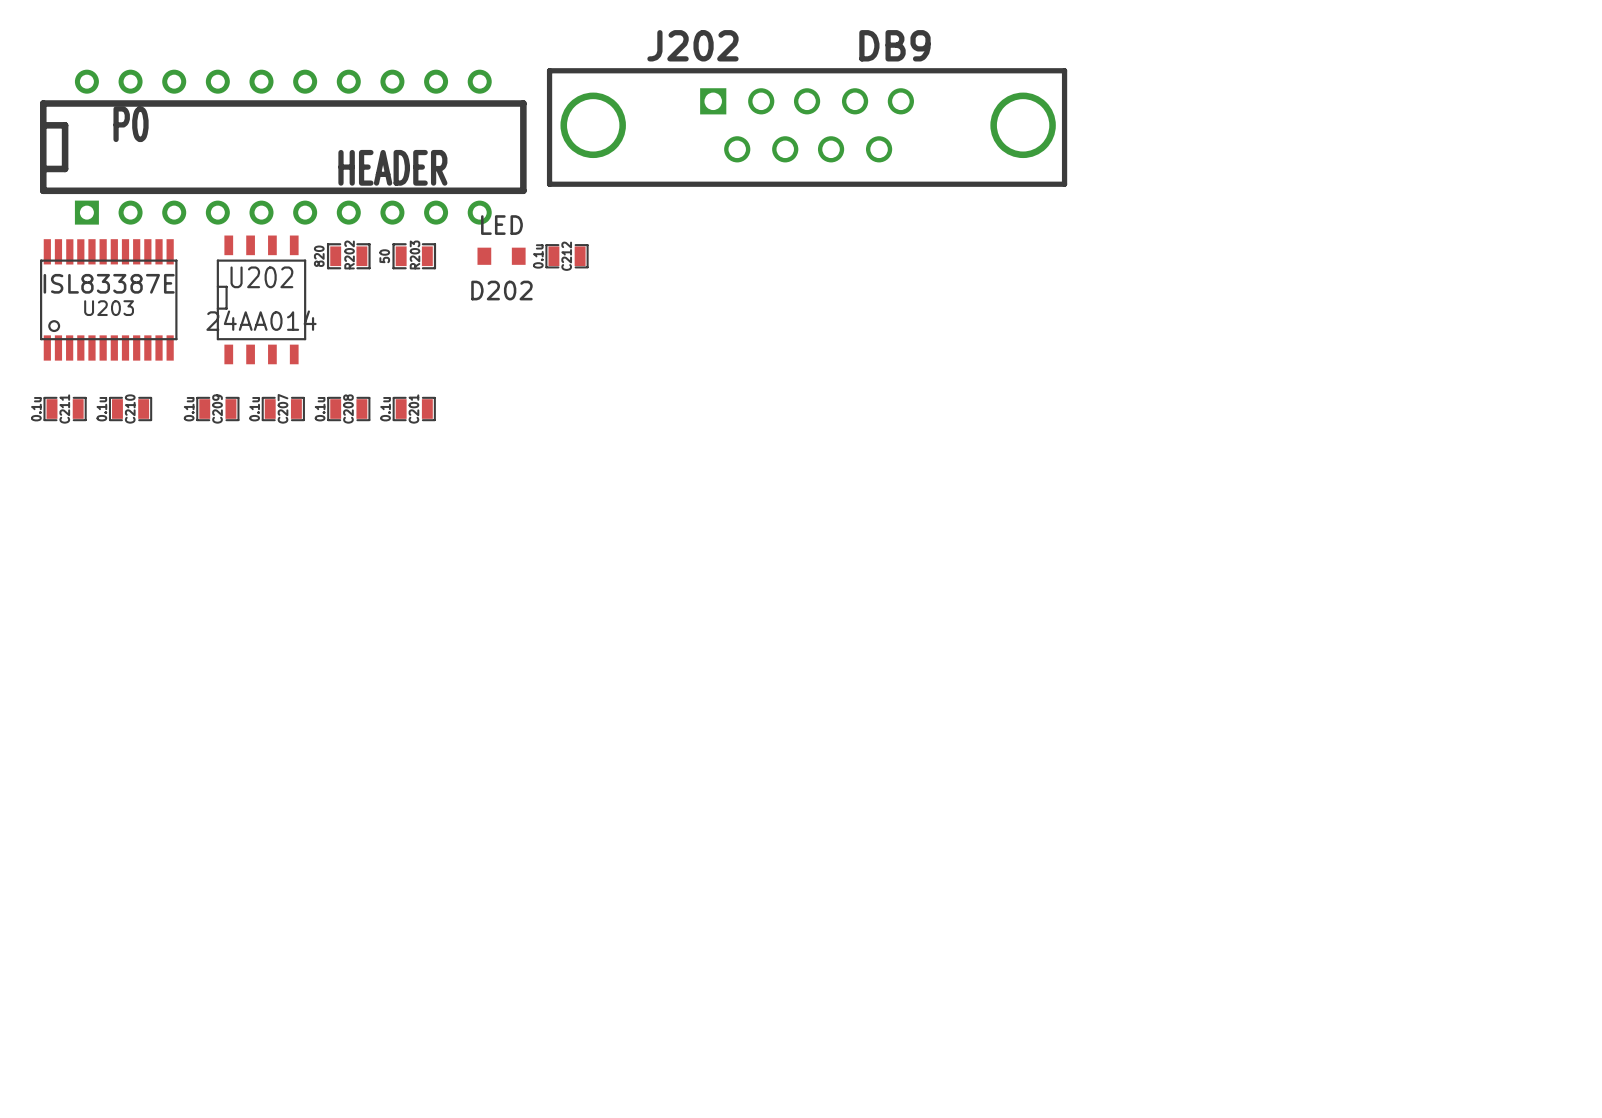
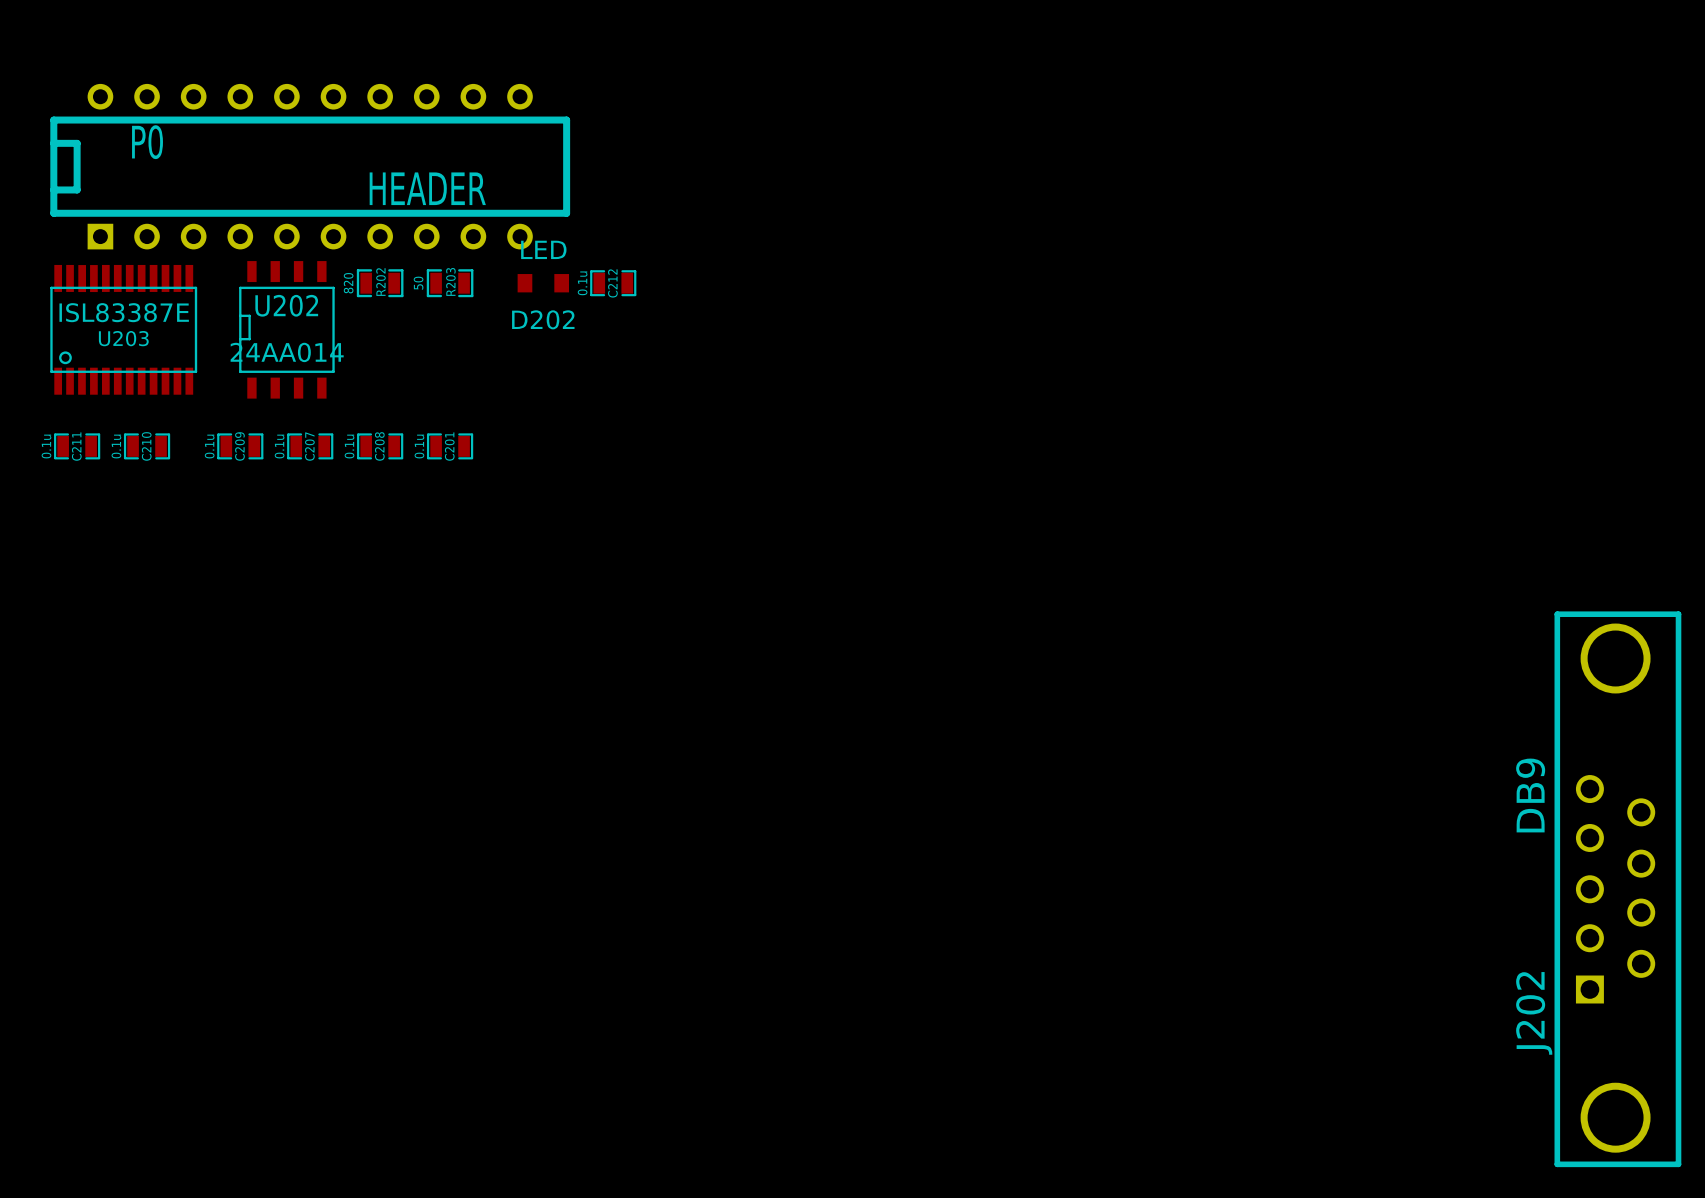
J202 rotation: 0° (807, 127) -> 90° counterclockwise (1617, 889)
J202 position: (807, 127) -> (1617, 889)

